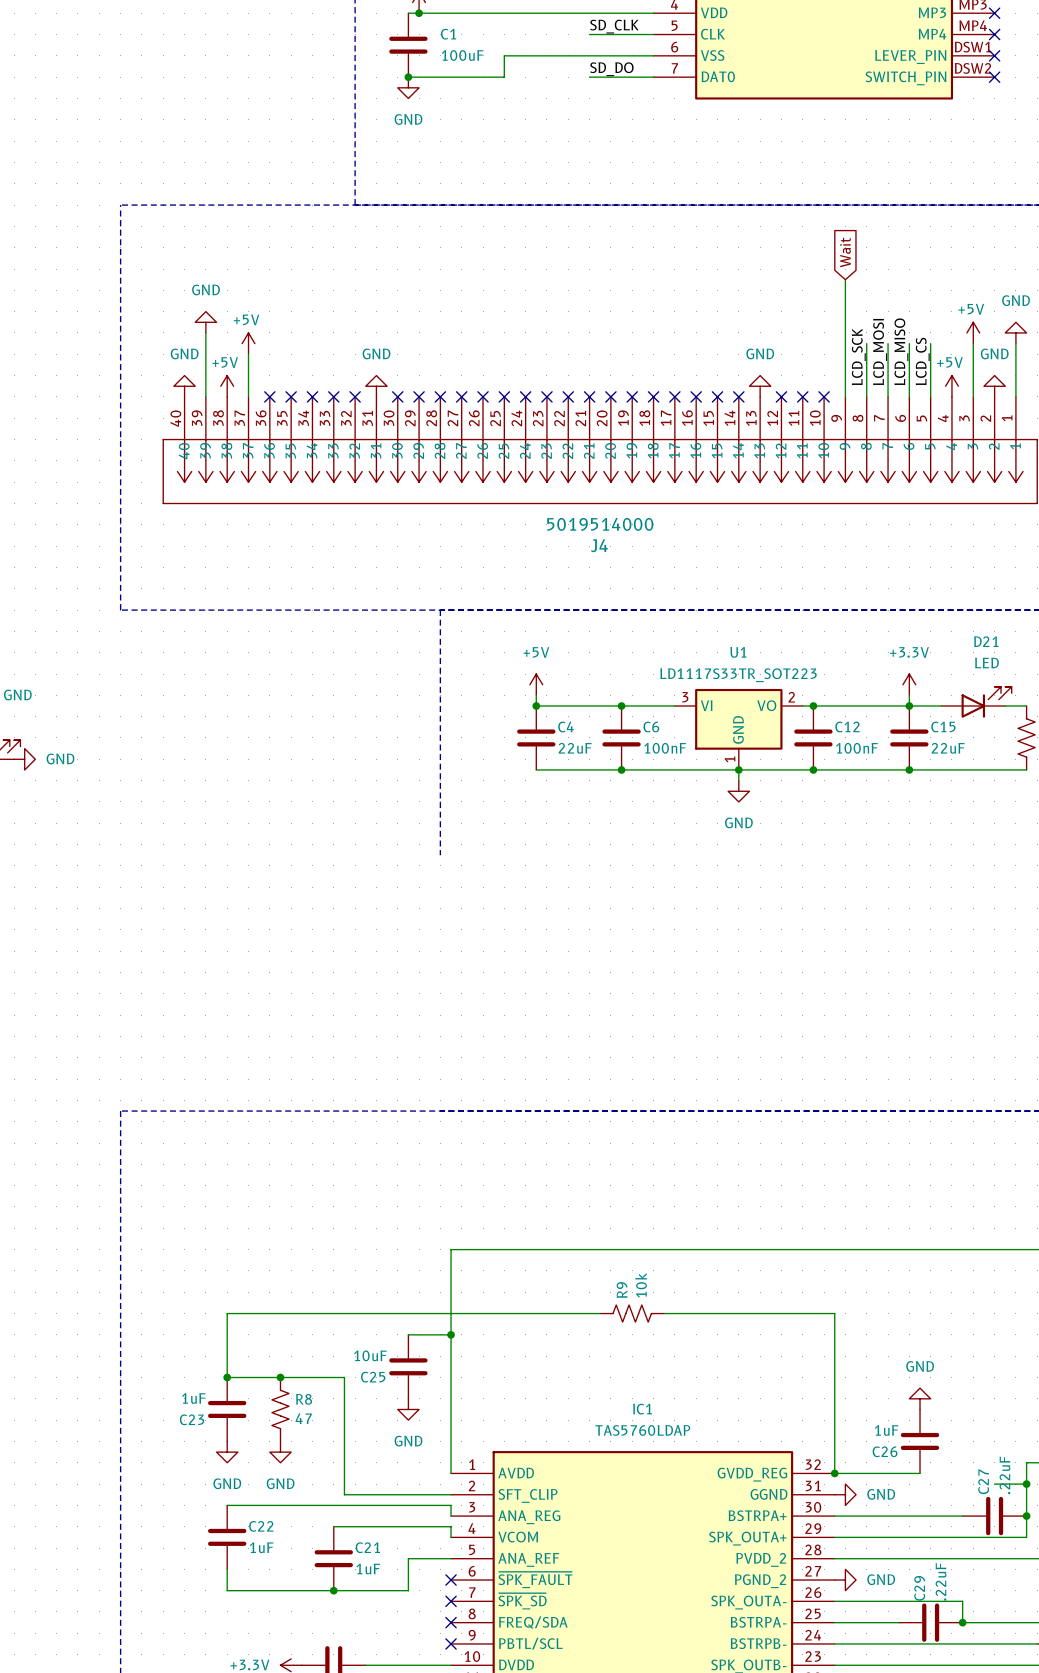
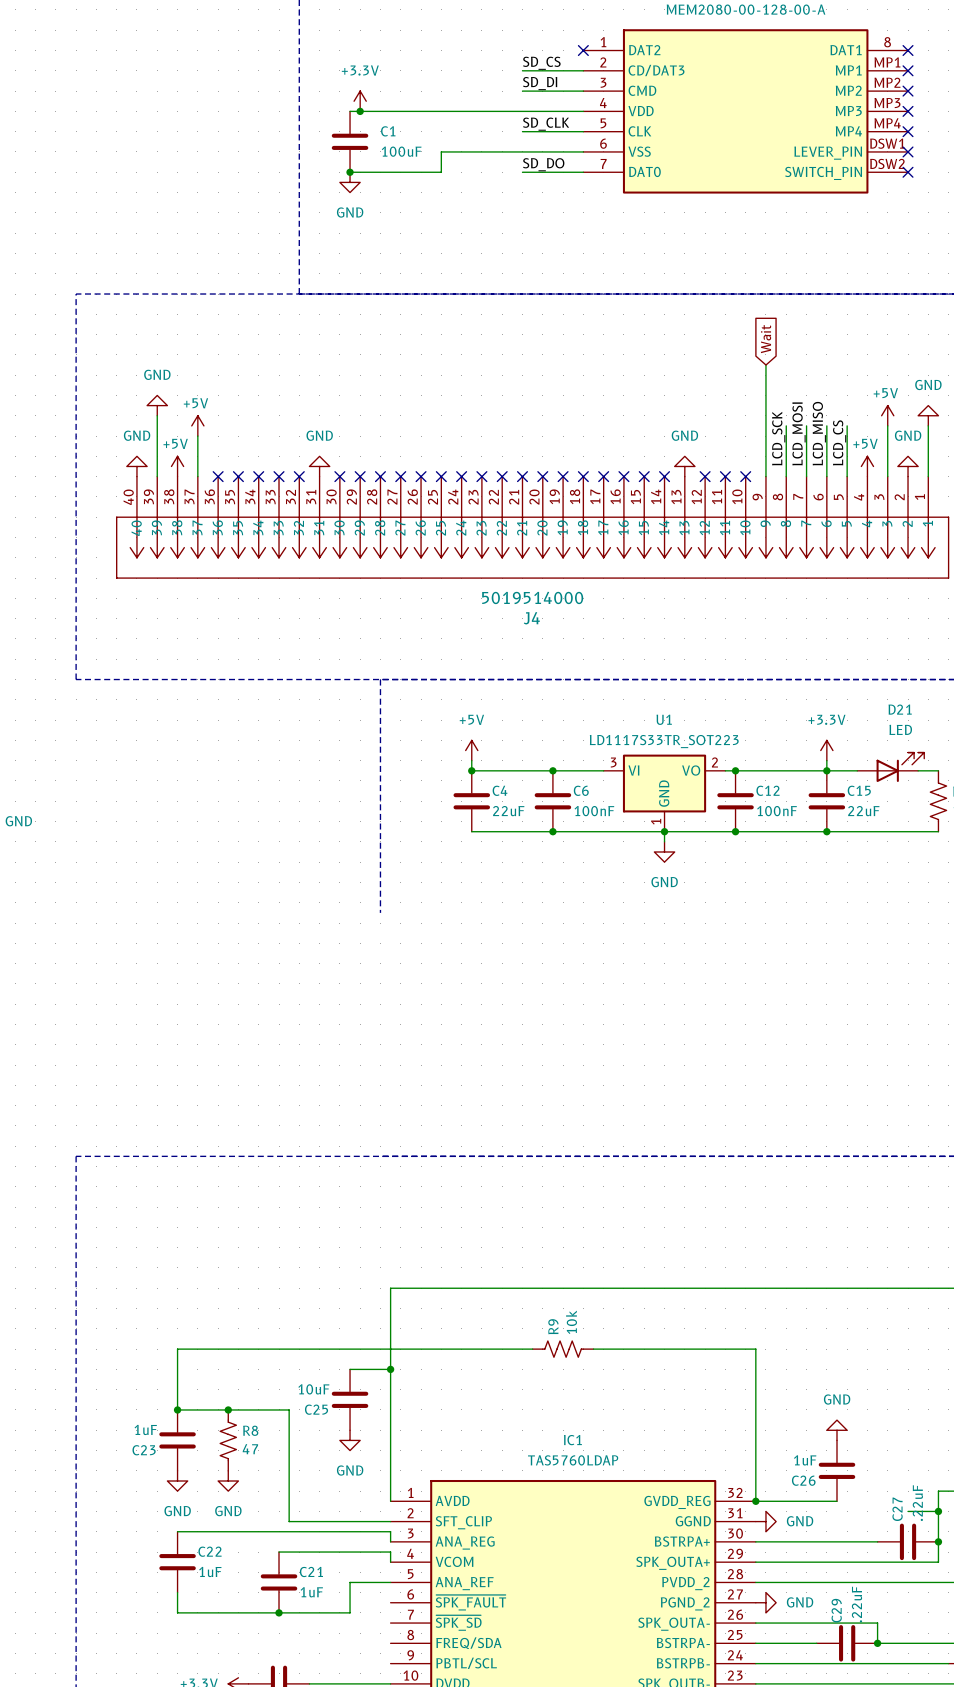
no-connect mark: (451, 1580) -> none
no-connect mark: (451, 1601) -> none
no-connect mark: (451, 1622) -> none
no-connect mark: (451, 1643) -> none

